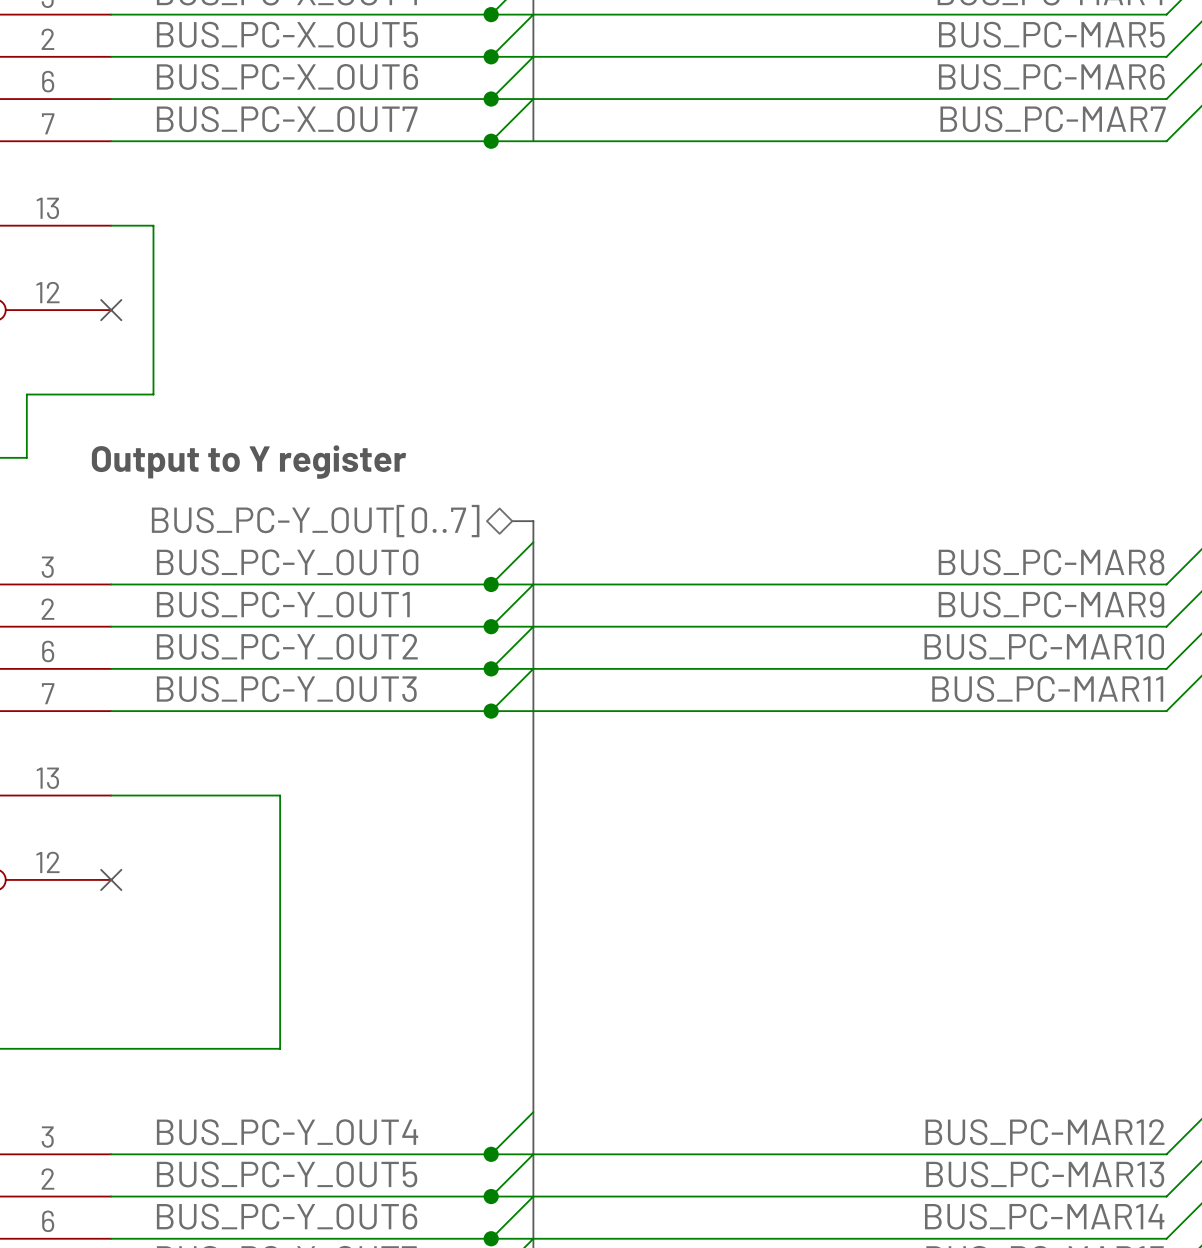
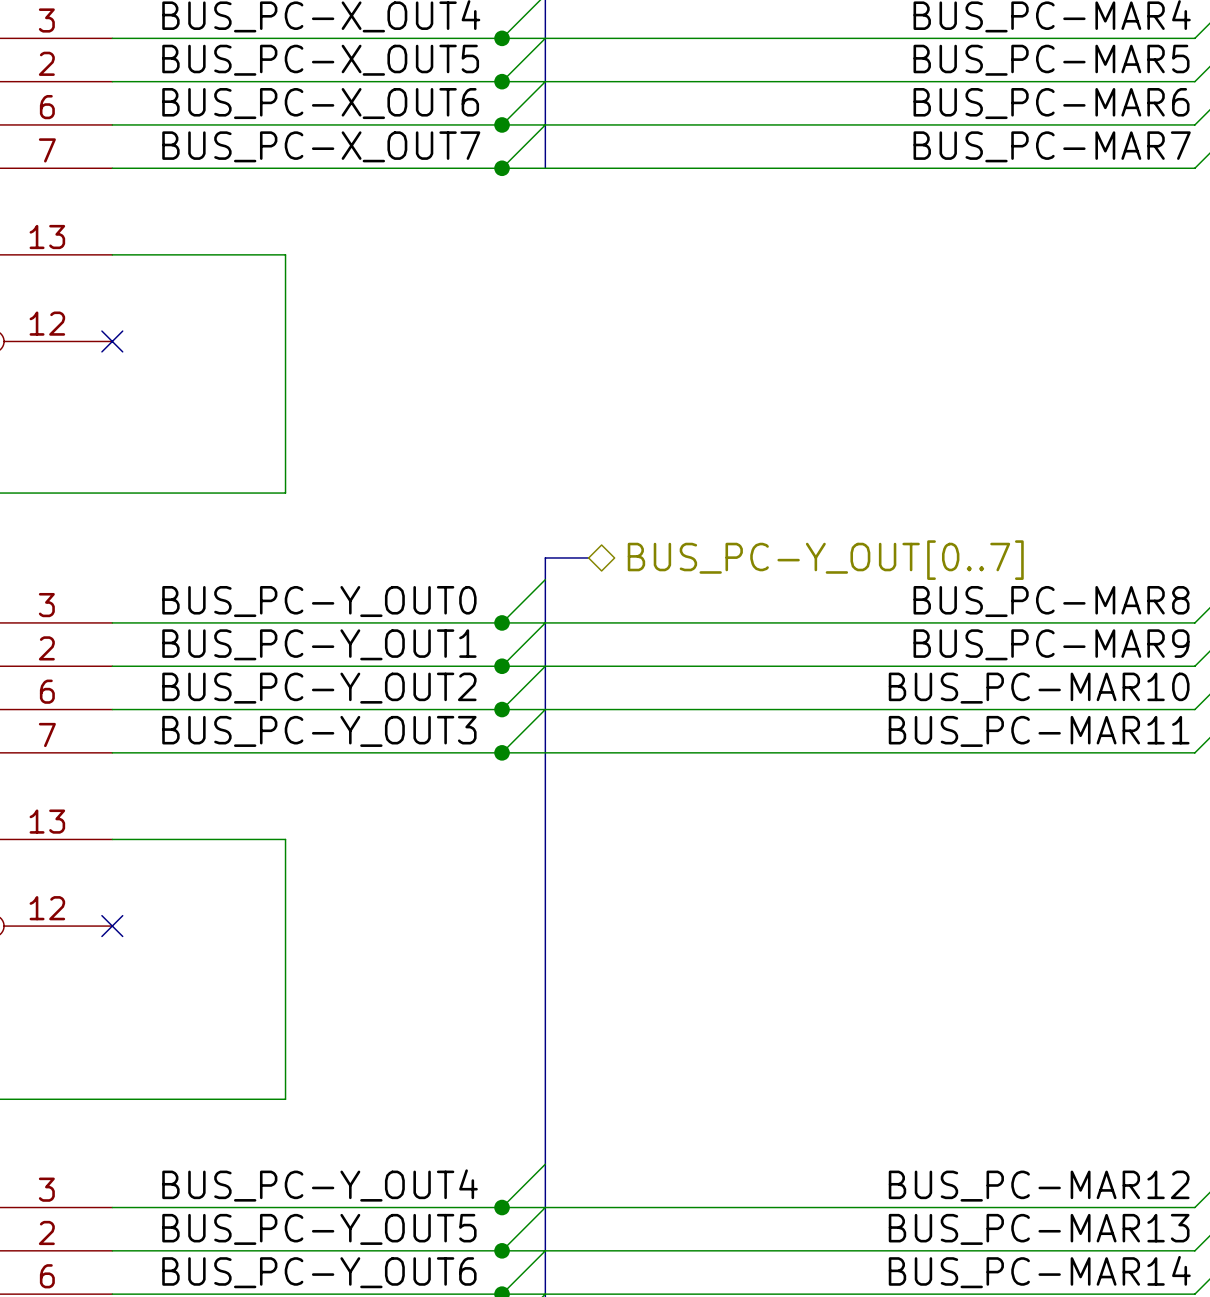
wire: (153, 225) (153, 394) (26, 394) (26, 457) -> (155, 254) (285, 254) (285, 493) (25, 493)
text: Output to Y register (249, 462) -> none
hierarchical label rotation: 0° (315, 521) -> 180° (825, 560)
hierarchical label position: BUS_PC-Y_OUT[0..7] (315, 521) -> BUS_PC-Y_OUT[0..7] (825, 560)
bus: (512, 521) (533, 521) -> (588, 557) (545, 557)

